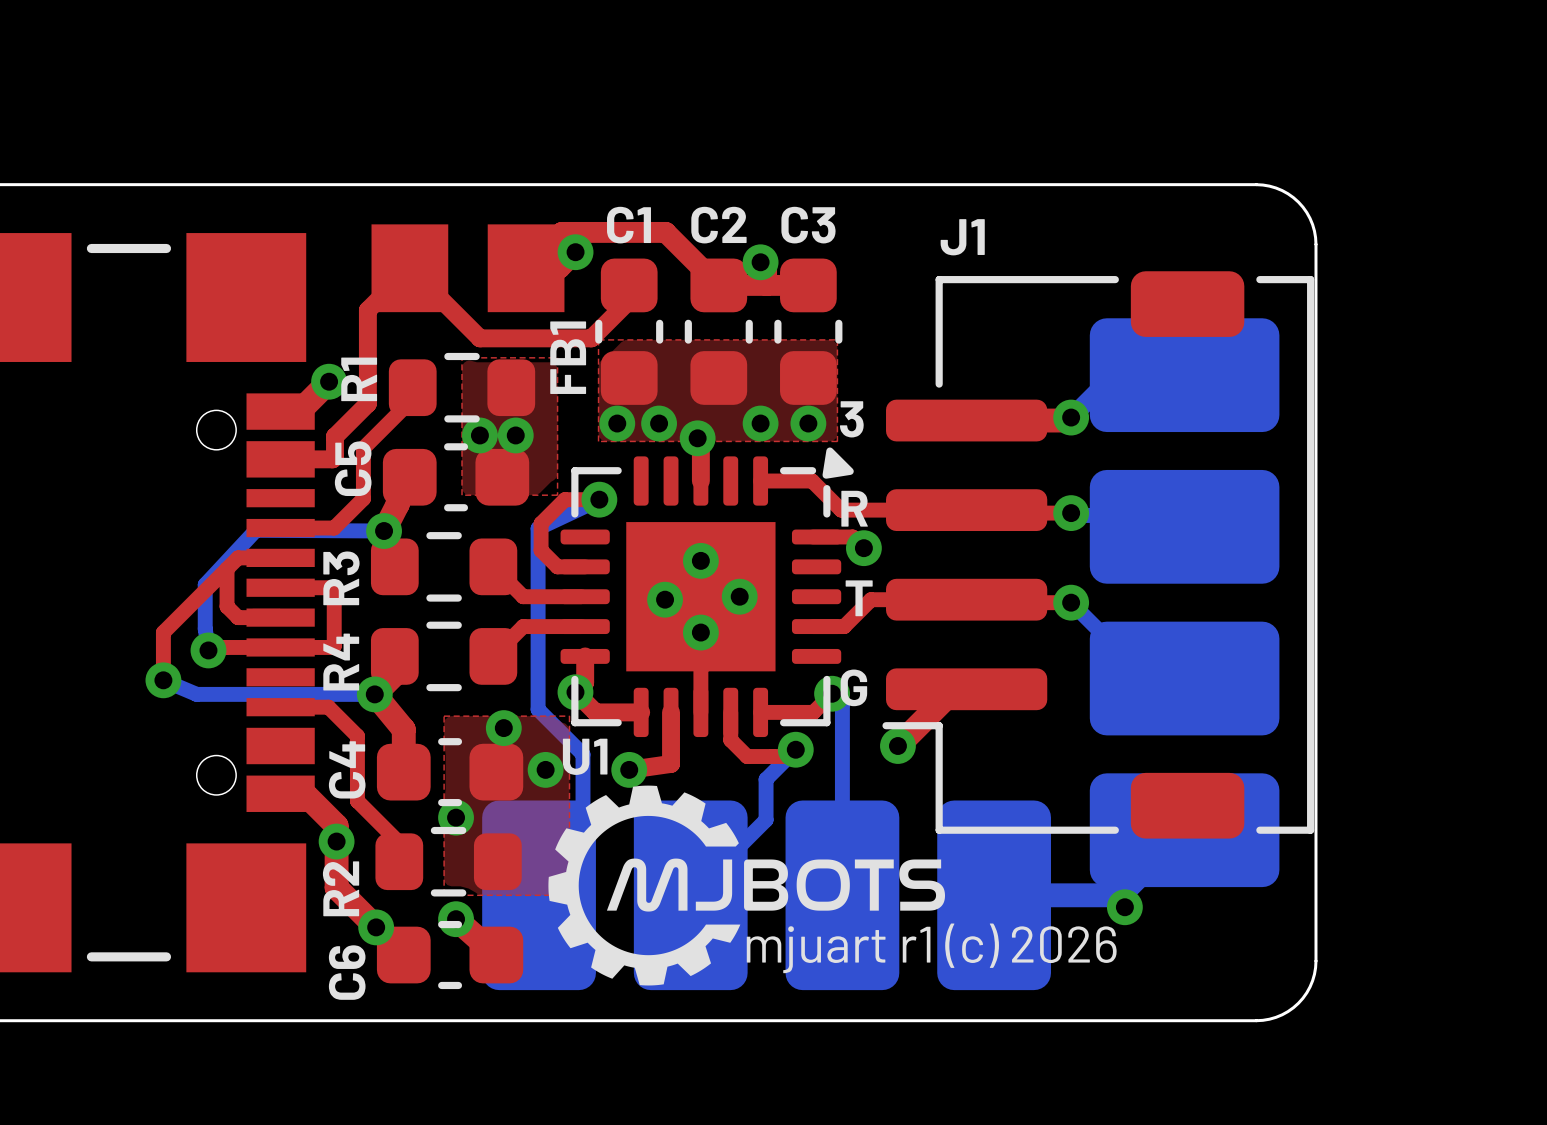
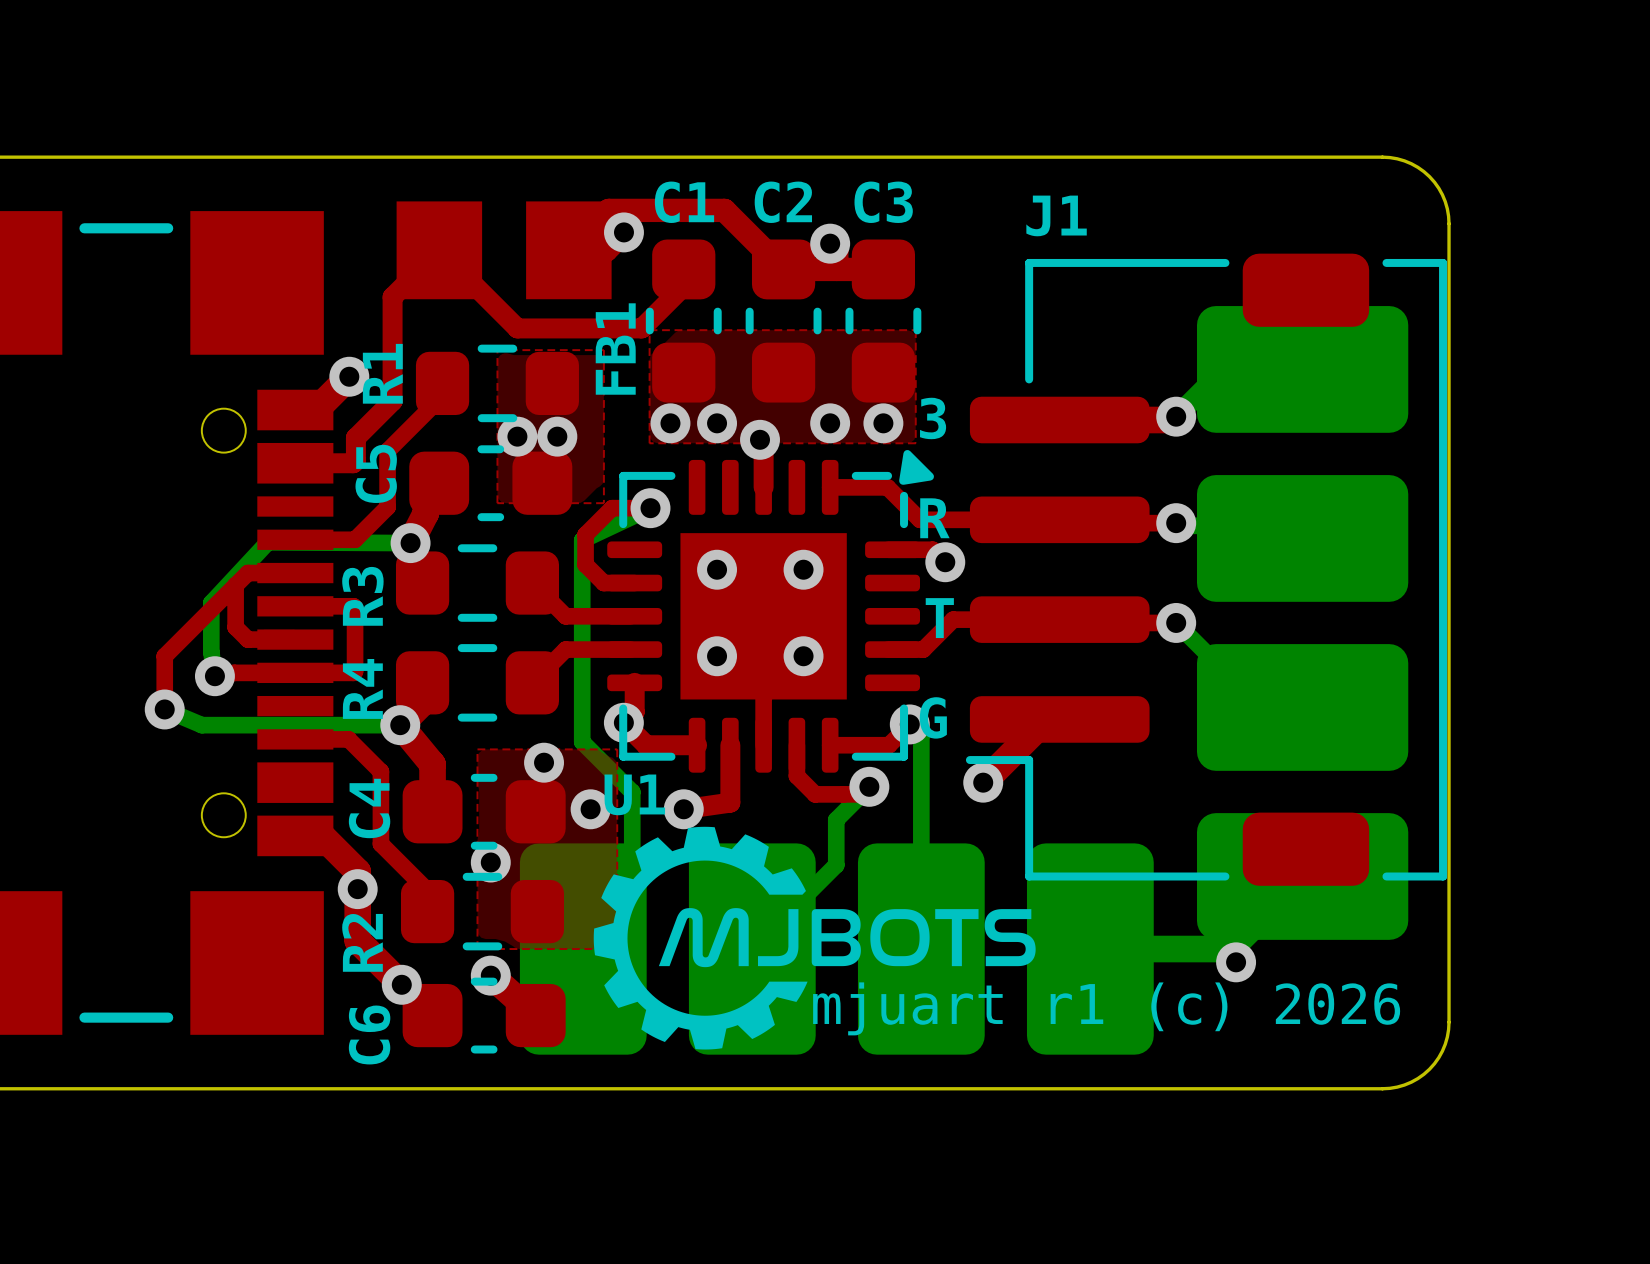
via: none -> (717, 569)
via position: (700, 560) -> (803, 569)
via: (739, 596) -> none
via position: (665, 599) -> (717, 656)
via: (700, 632) -> none
via: none -> (803, 656)

